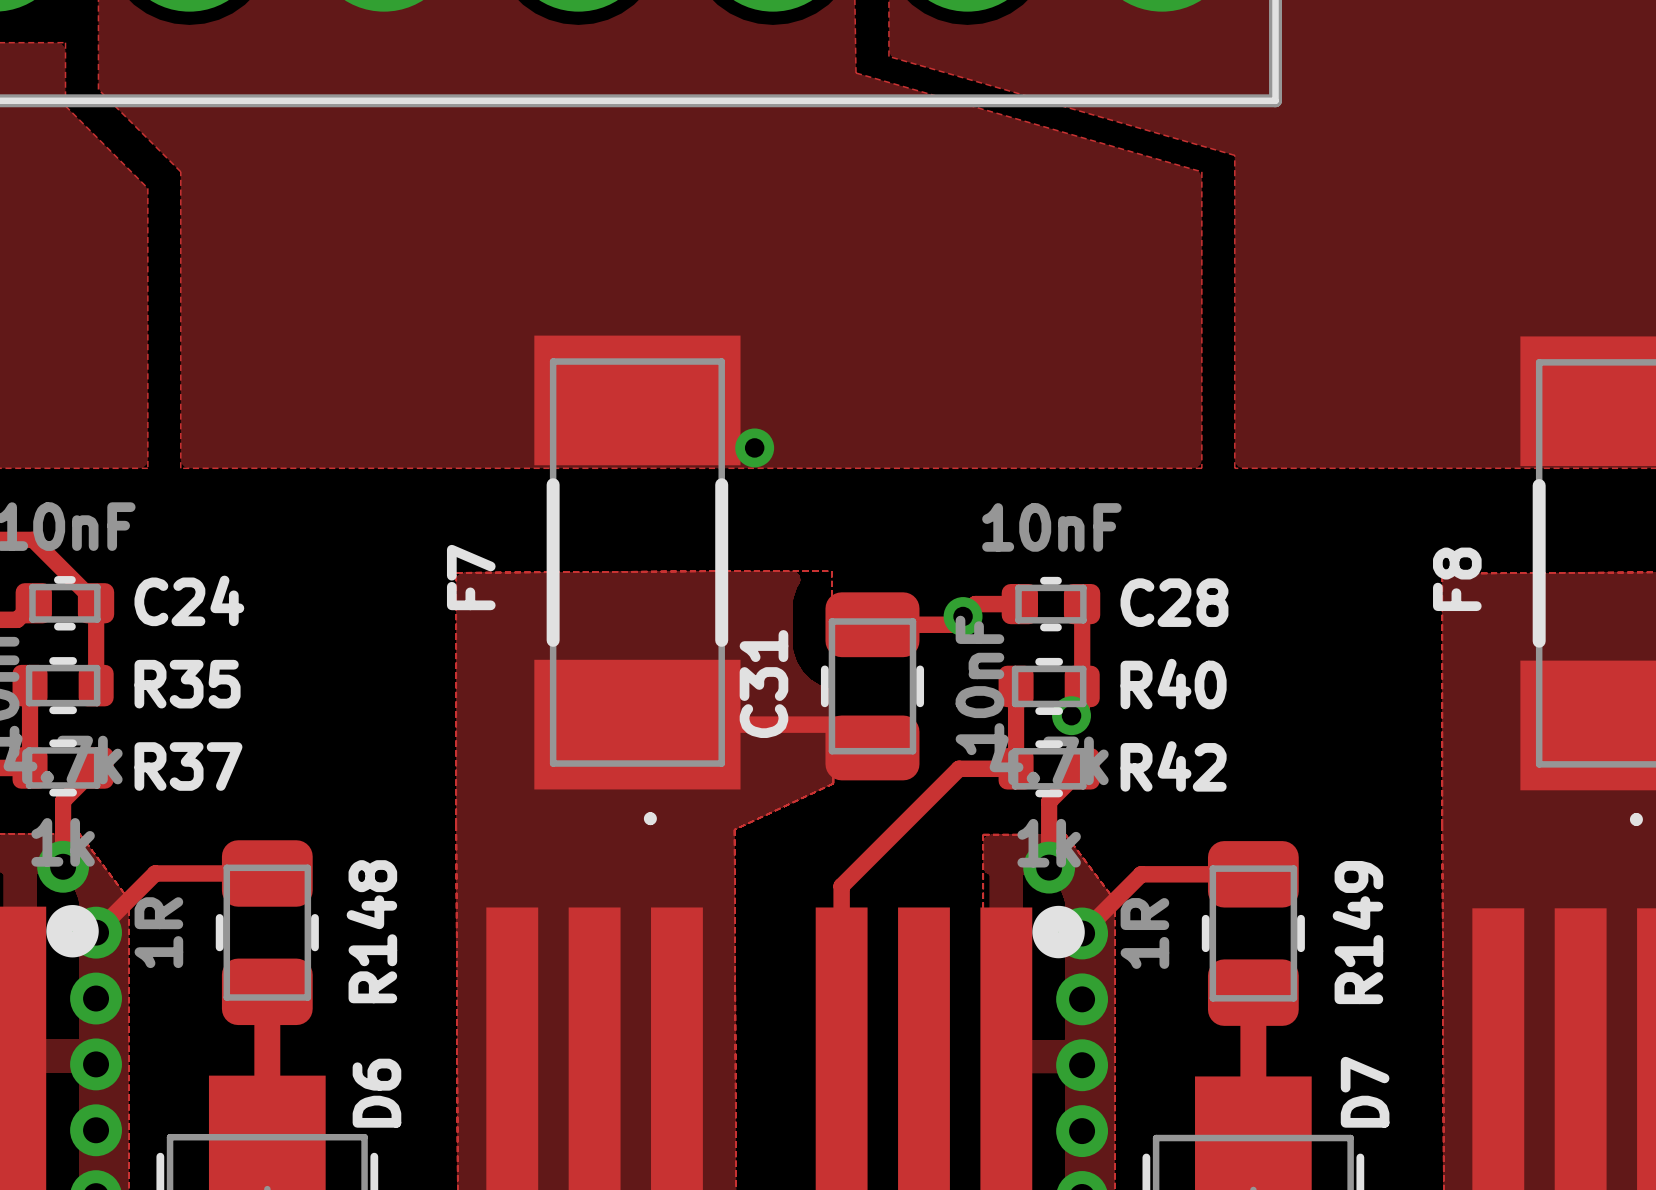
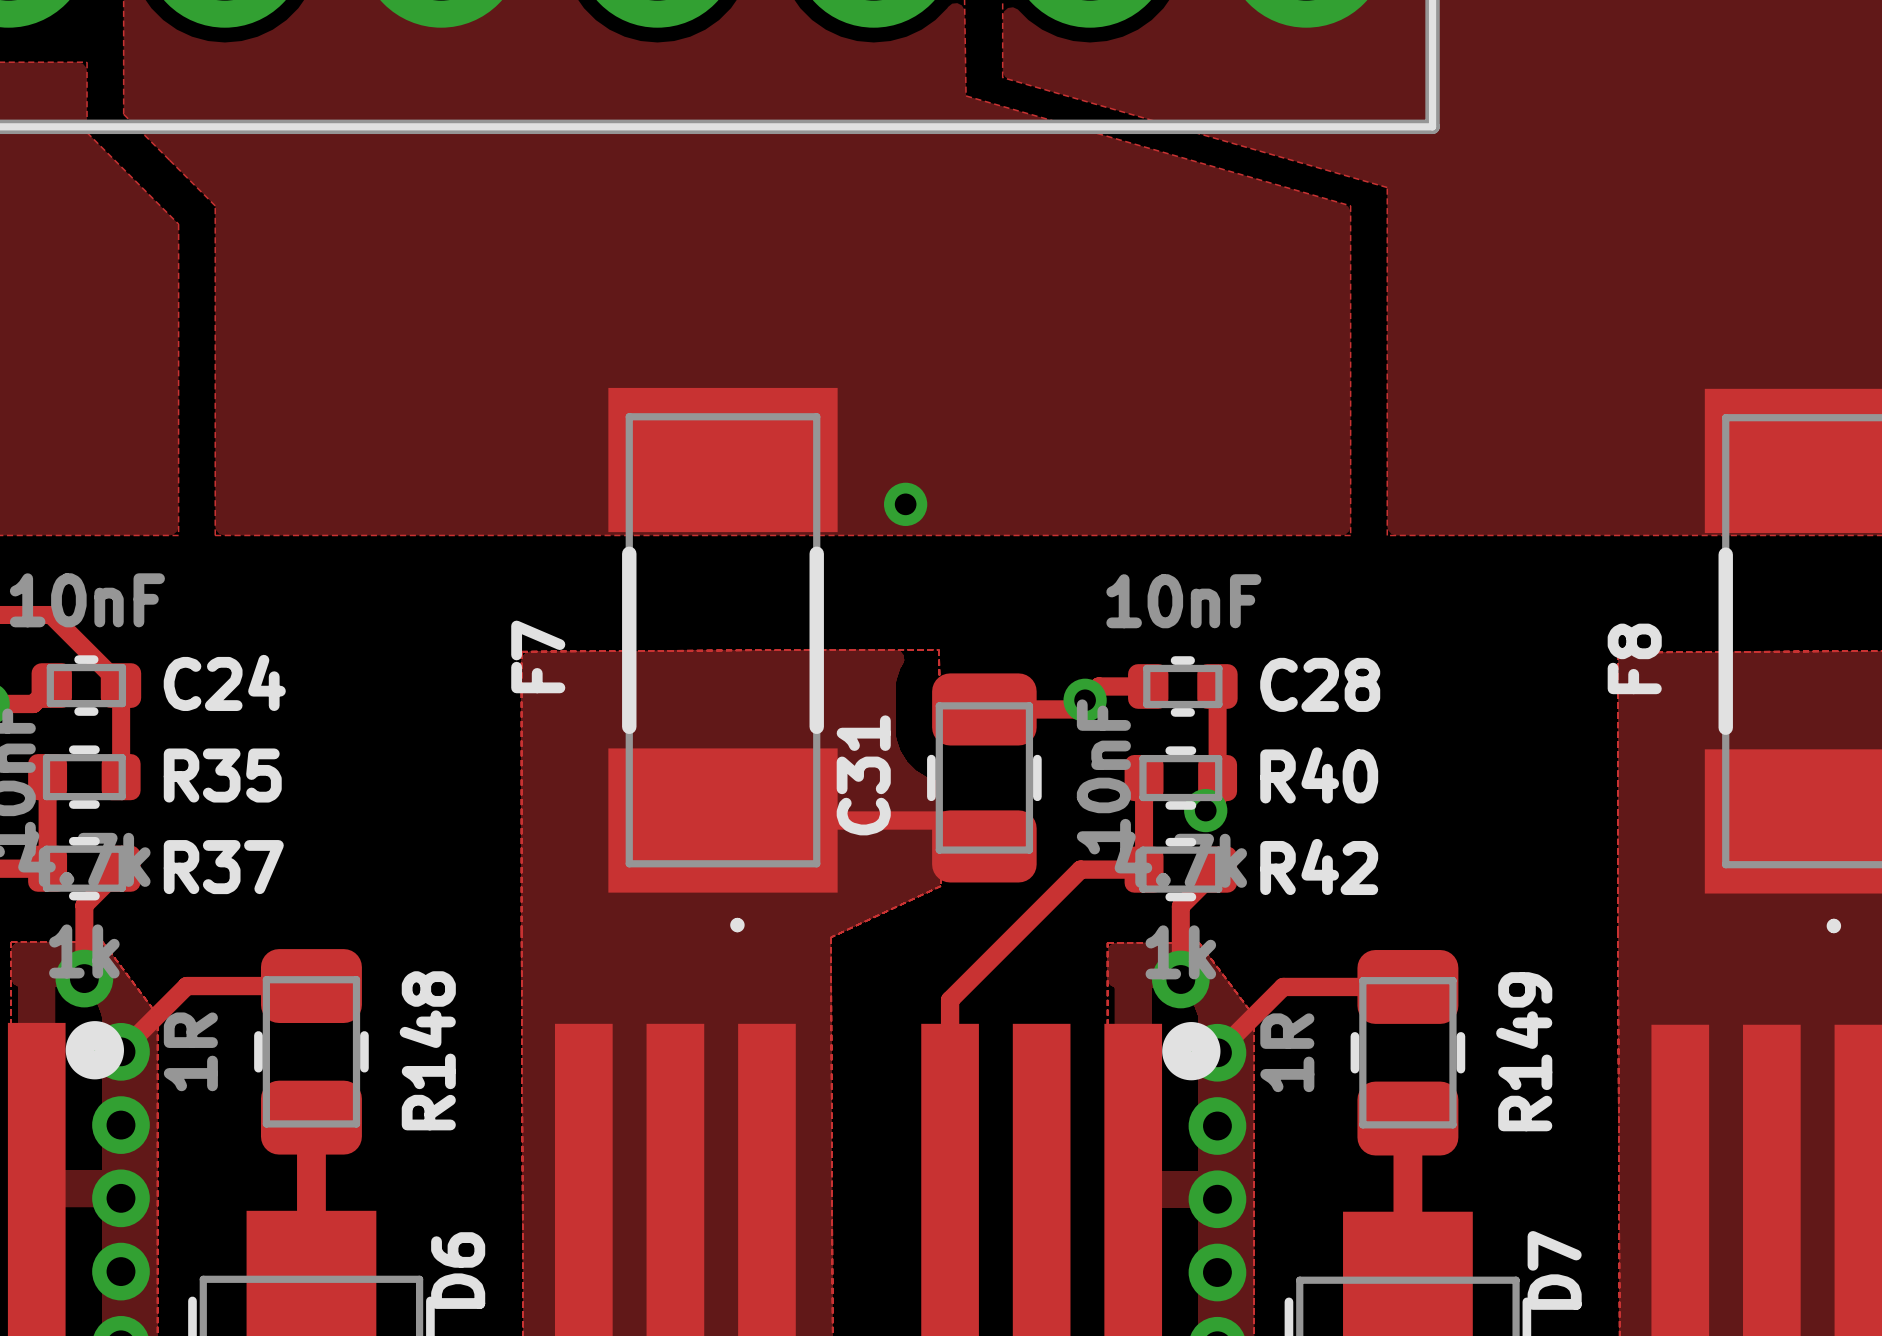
via position: (754, 447) -> (905, 504)
D7 name position: D7 (1365, 1092) -> D7 (1554, 1270)
D6 name position: D6 (376, 1093) -> D6 (458, 1270)

